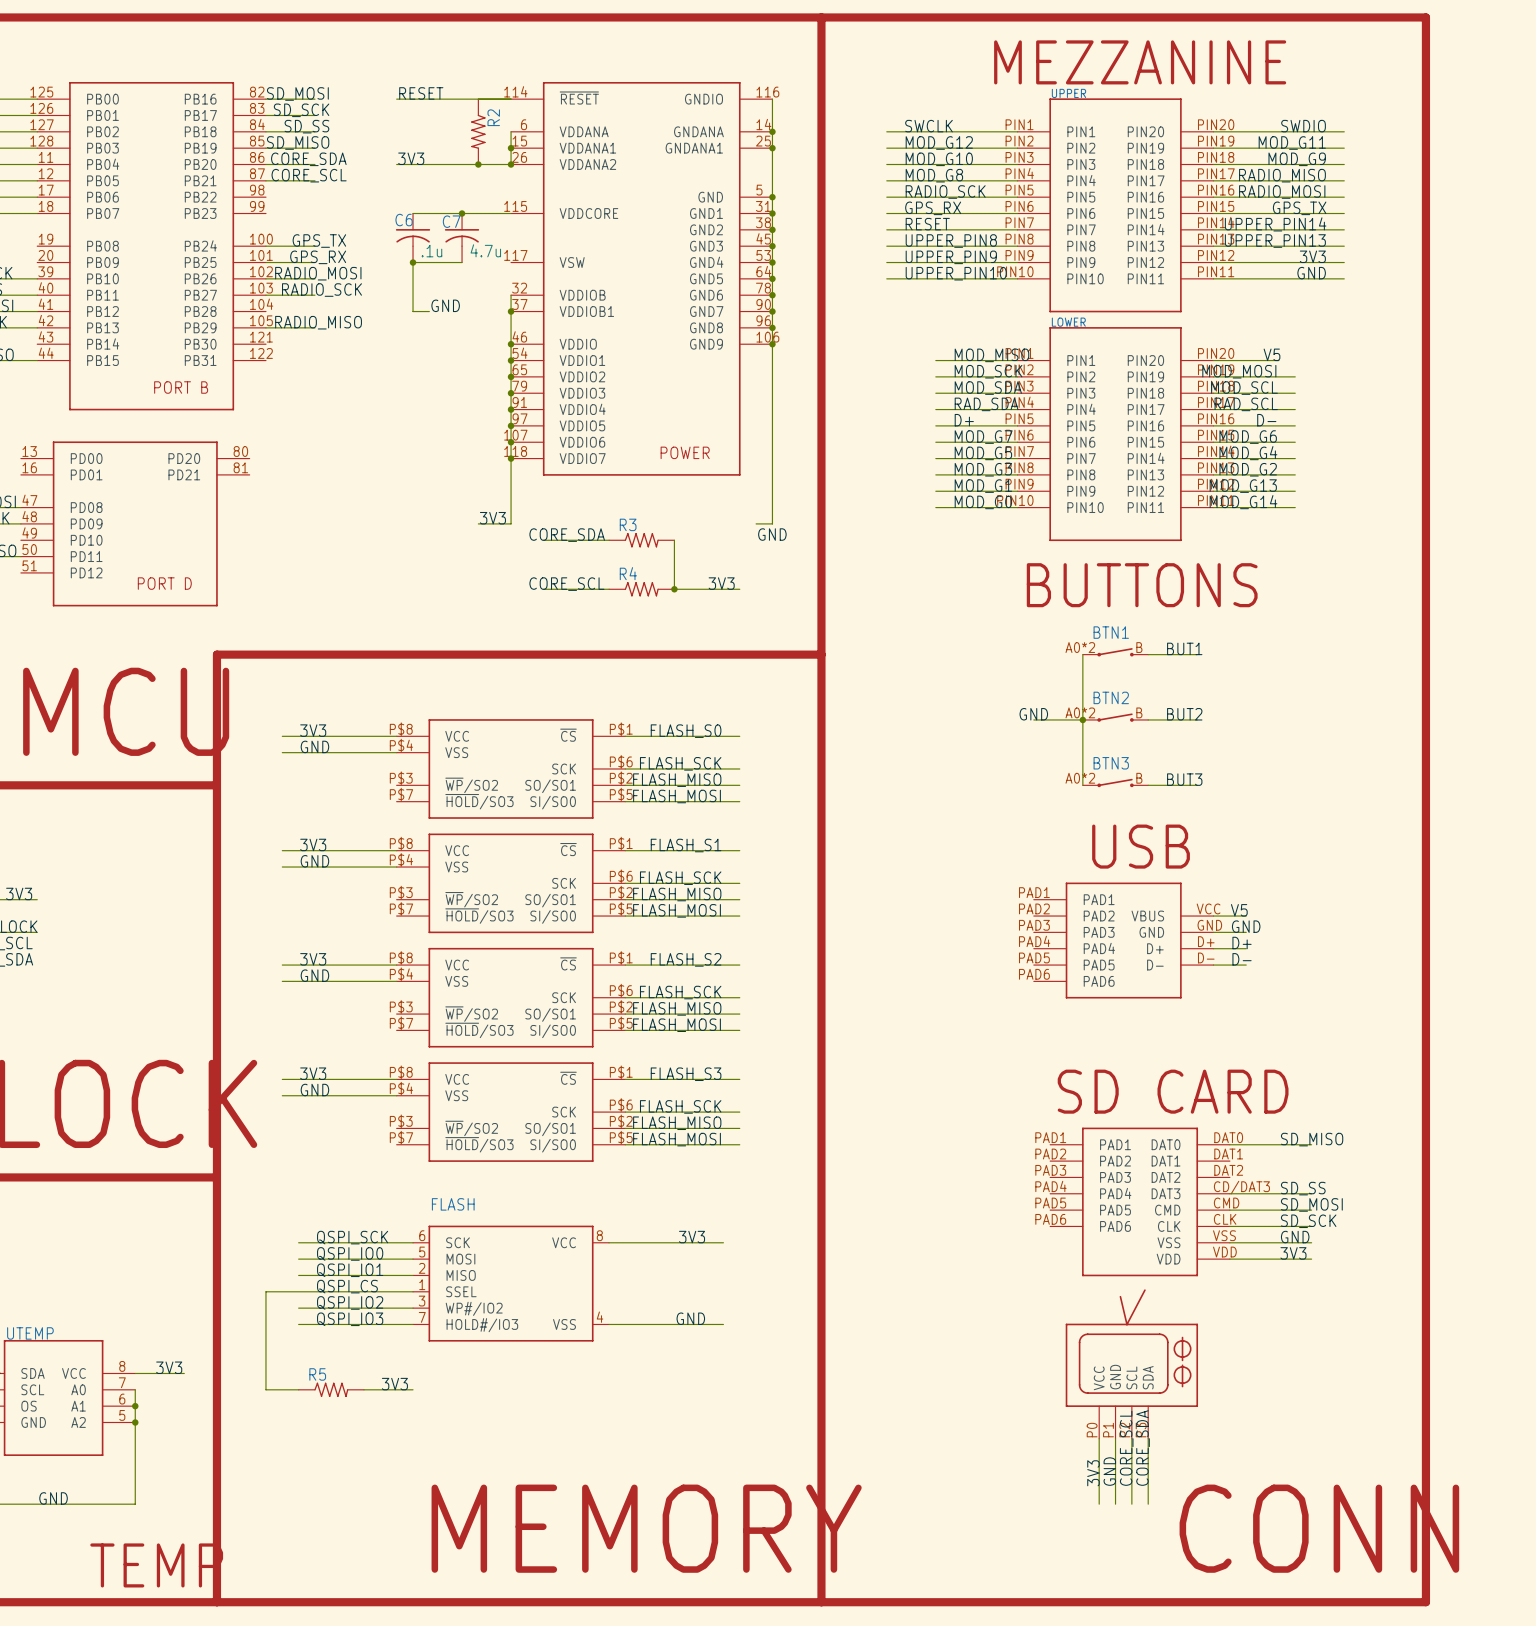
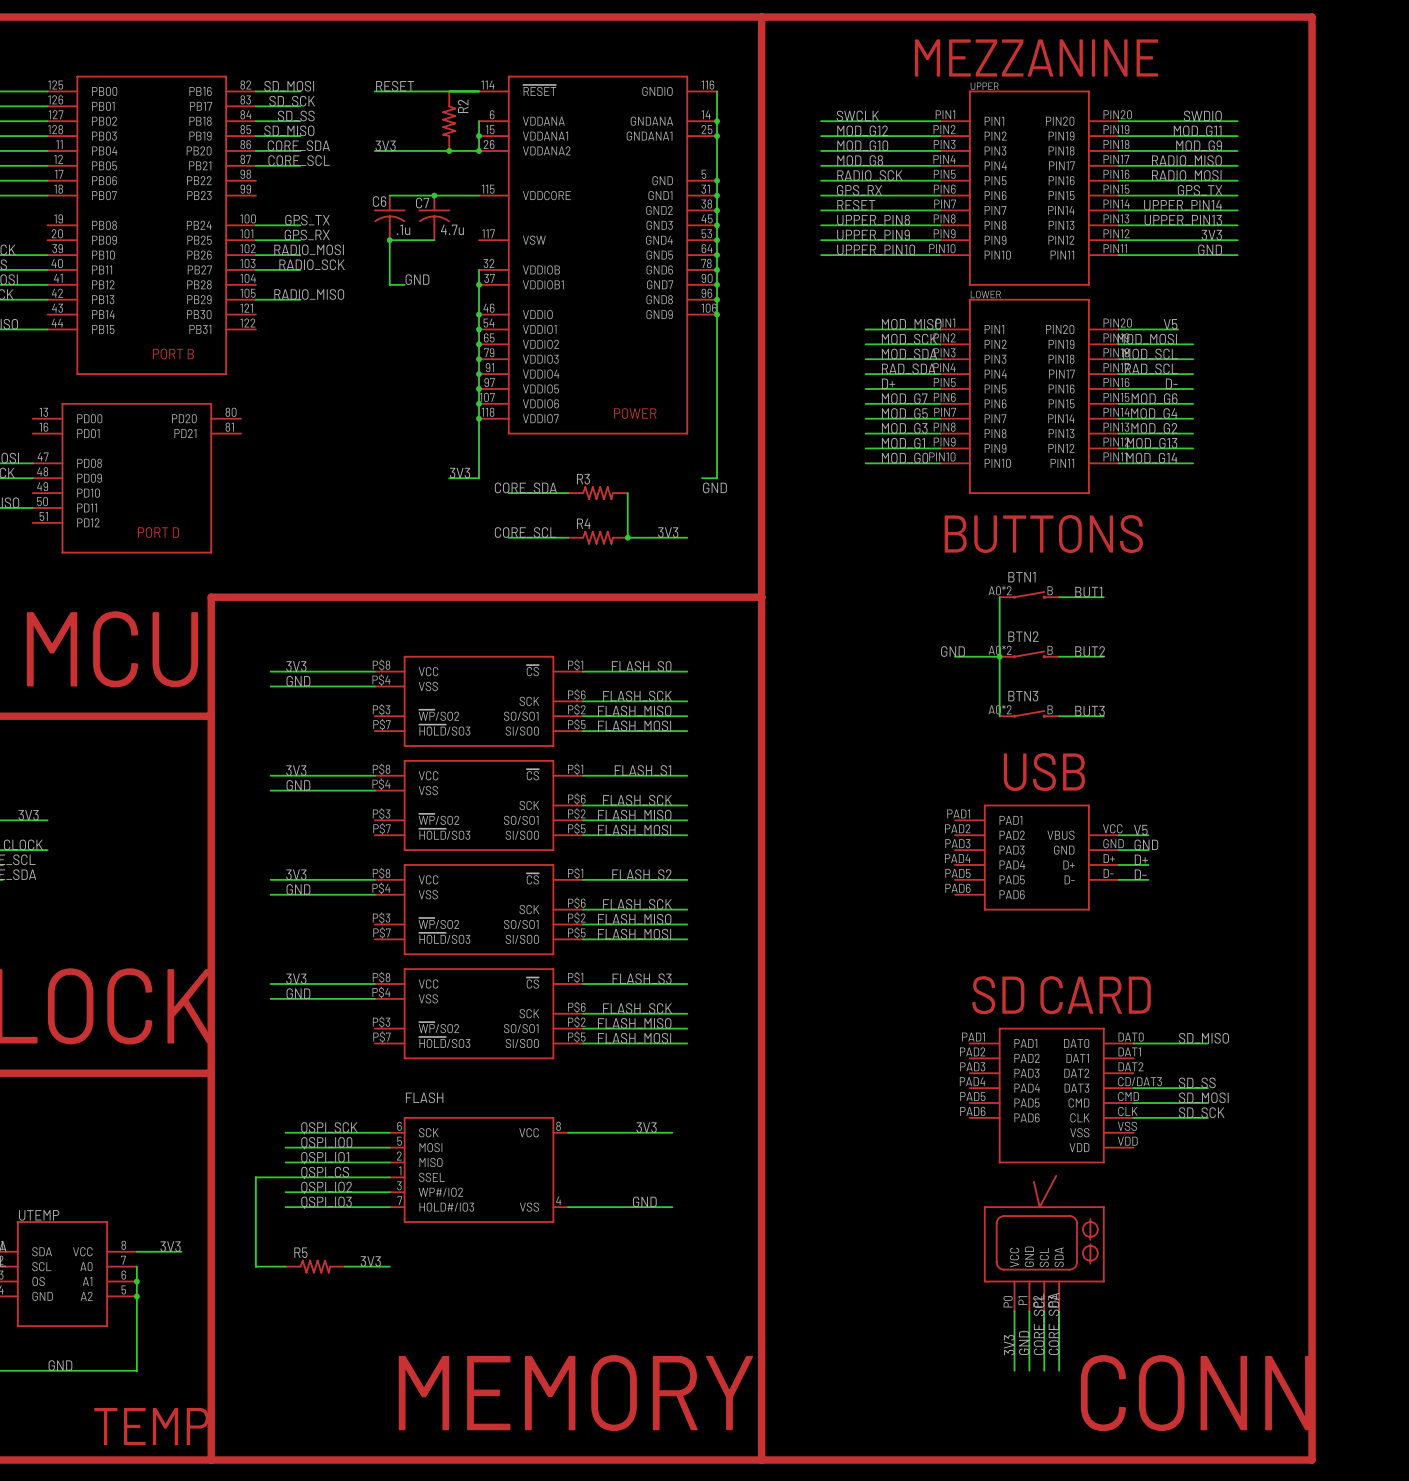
label: GND (1295, 1237) -> none
wire: (1229, 1242) (1311, 1242) -> none
label: 3V3 (1293, 1253) -> none
wire: (1229, 1259) (1311, 1259) -> none

